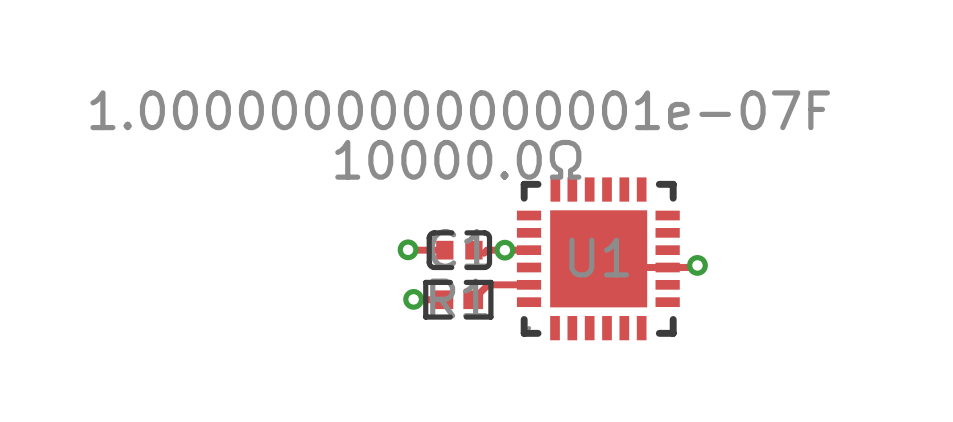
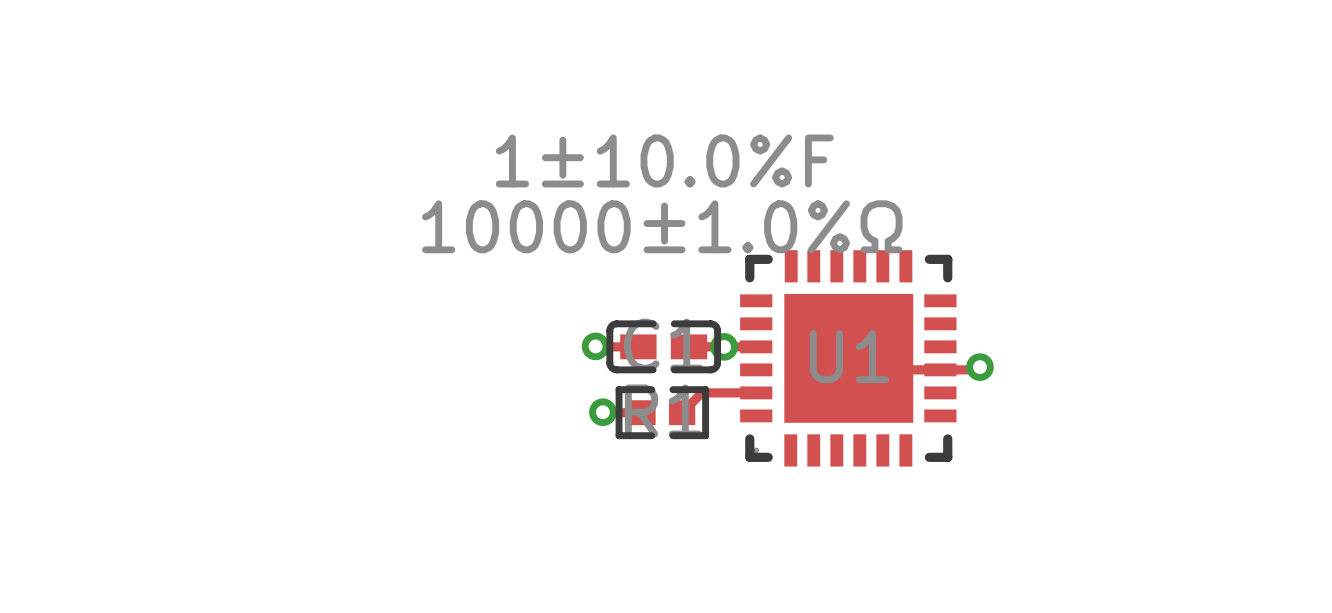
part value: 1.0000000000000001e-07F (460, 110) -> 1±10.0%F (664, 160)
part value: 10000.0Ω (458, 159) -> 10000±1.0%Ω (662, 226)
part footprint: [426, 230, 493, 271] -> [606, 320, 722, 374]

